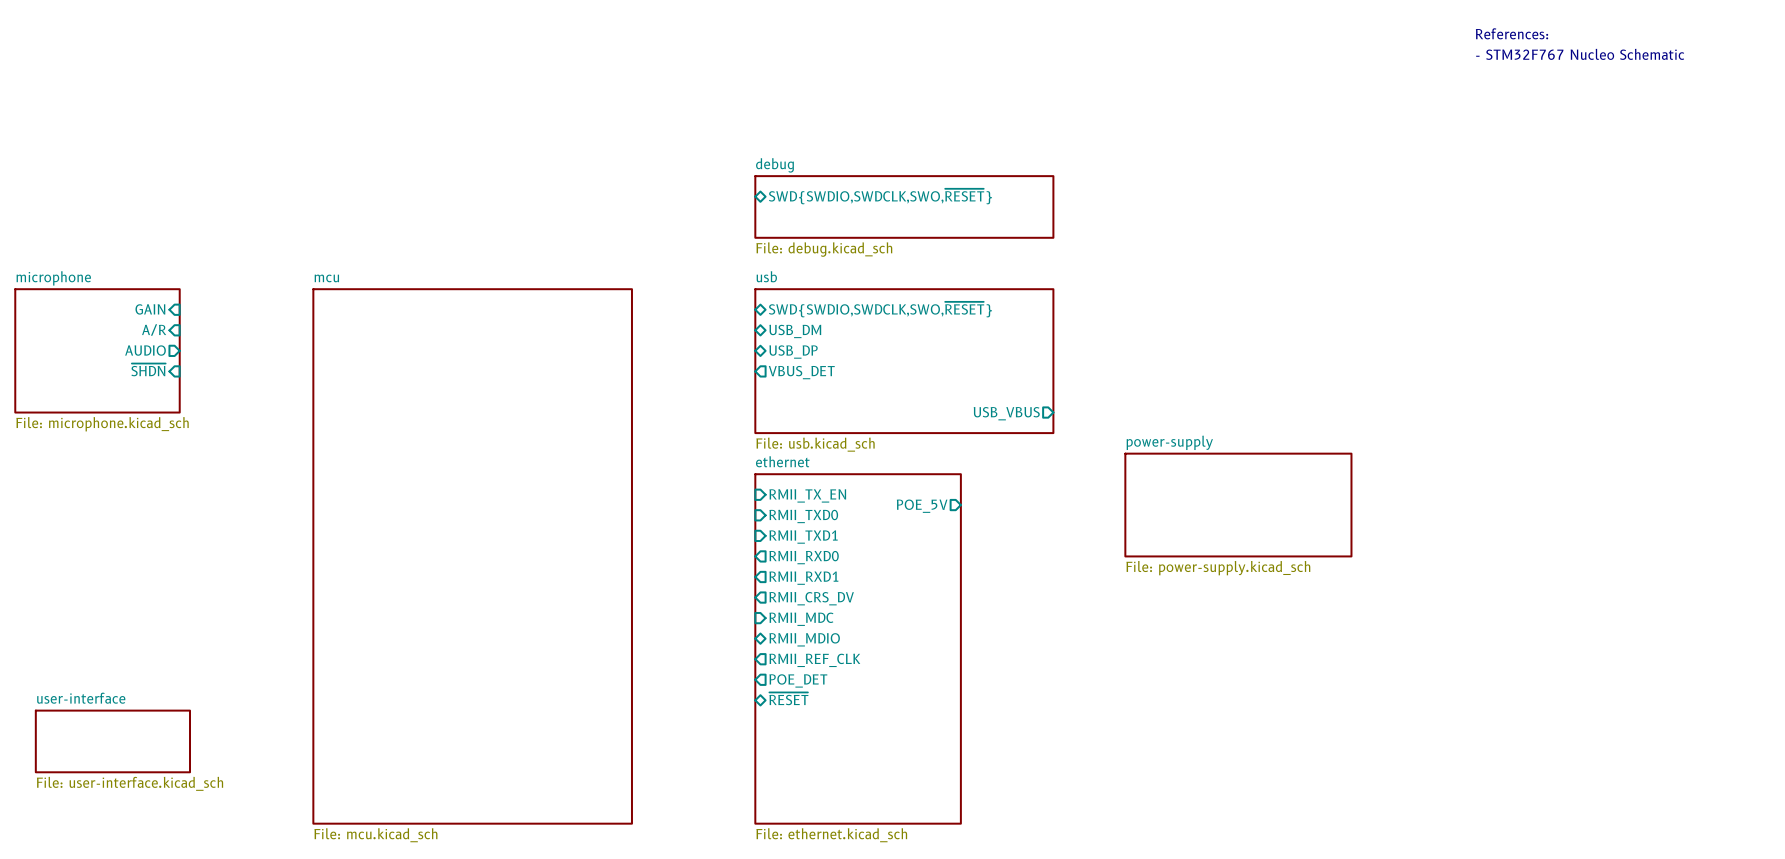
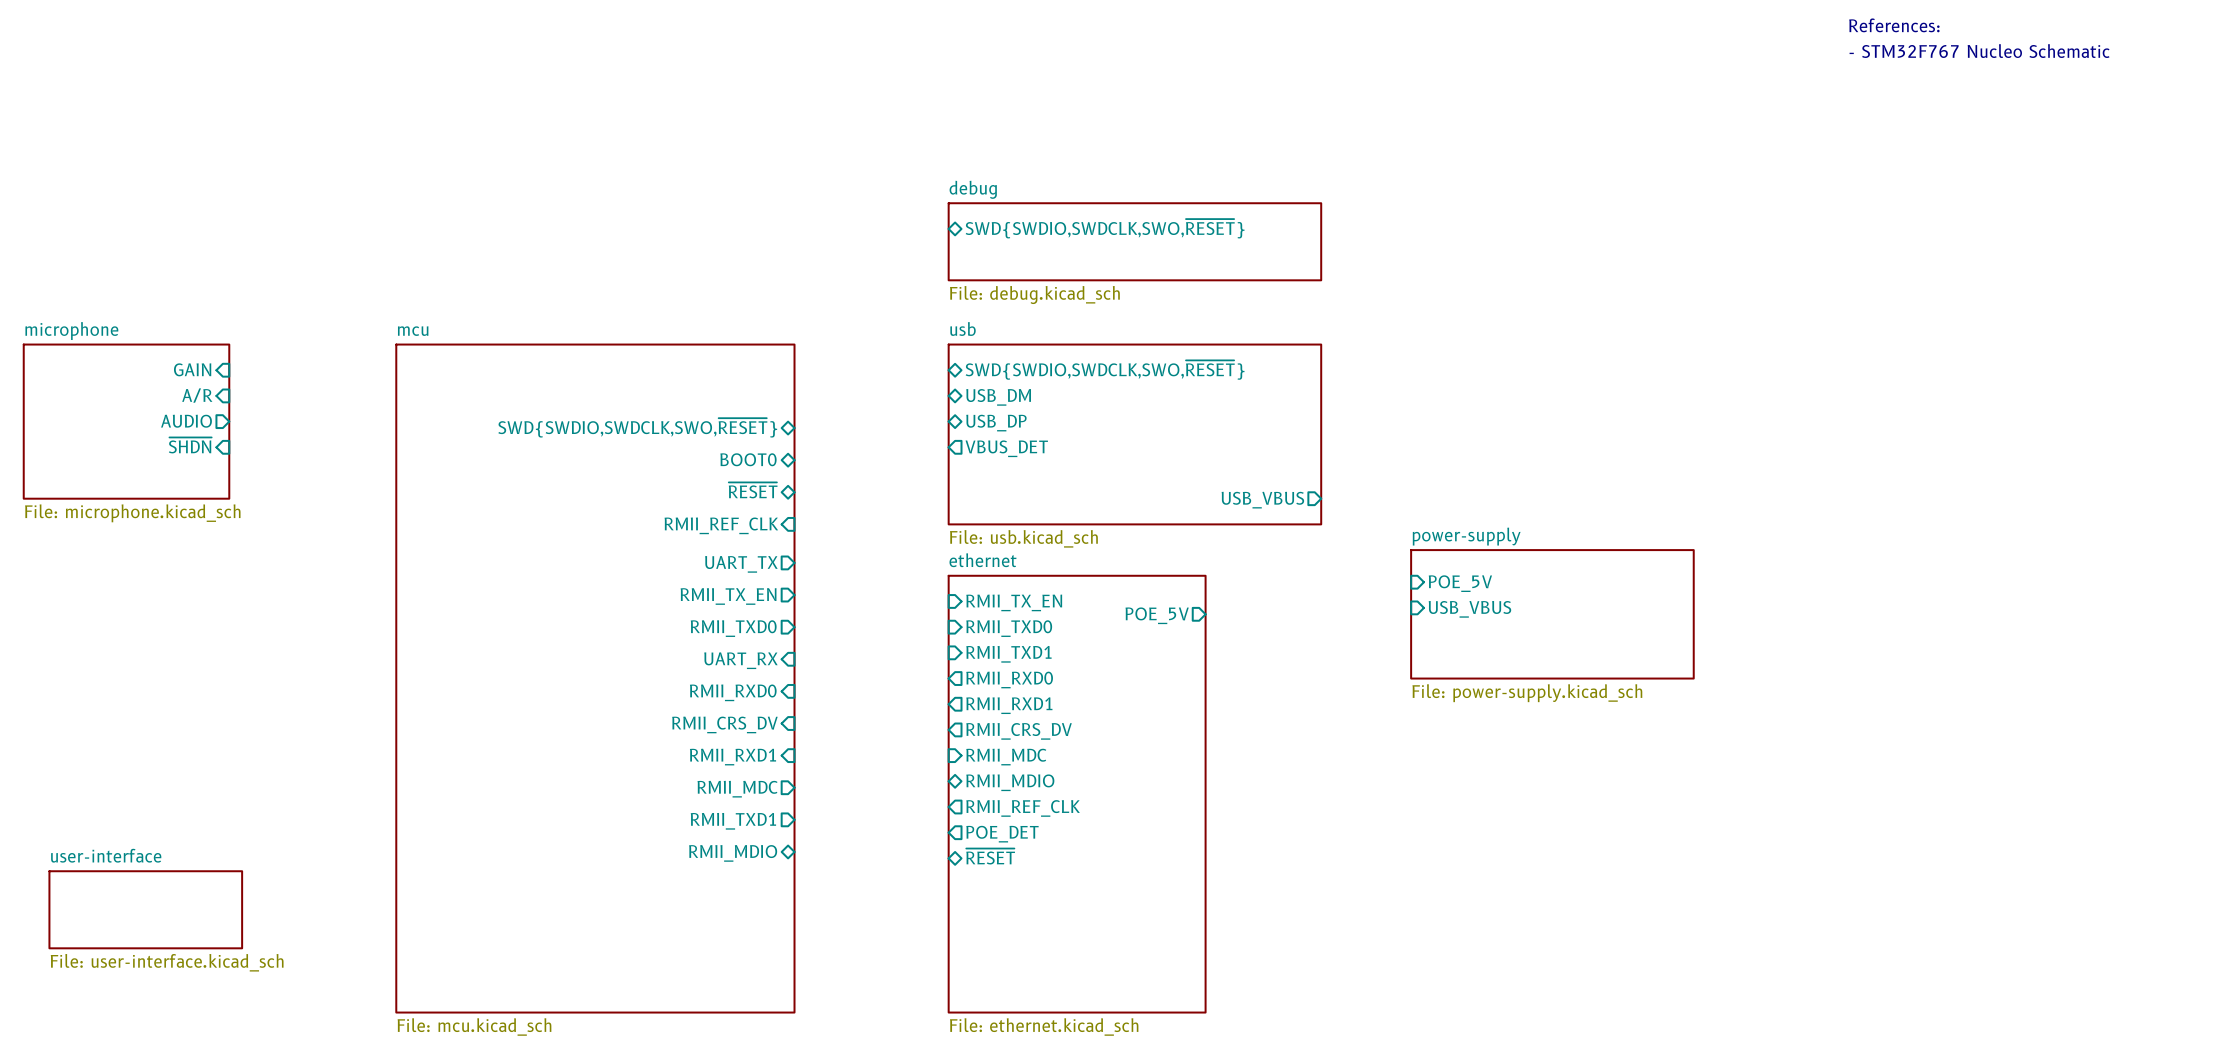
sheet pin: none -> SWD{SWDIO,SWDCLK,SWO,~{RESET}} (637, 427)
sheet pin: none -> BOOT0 (748, 459)
sheet pin: none -> ~{RESET} (753, 490)
sheet pin: none -> RMII_REF_CLK (721, 525)
sheet pin: none -> UART_TX (741, 564)
sheet pin: none -> POE_5V (1460, 583)
sheet pin: none -> RMII_TX_EN (728, 596)
sheet pin: none -> USB_VBUS (1469, 609)
sheet pin: none -> RMII_TXD0 (733, 628)
sheet pin: none -> UART_RX (740, 660)
sheet pin: none -> RMII_RXD0 (733, 692)
sheet pin: none -> RMII_CRS_DV (724, 724)
sheet pin: none -> RMII_RXD1 (733, 757)
sheet pin: none -> RMII_MDC (737, 789)
sheet pin: none -> RMII_TXD1 (733, 821)
sheet pin: none -> RMII_MDIO (733, 853)

